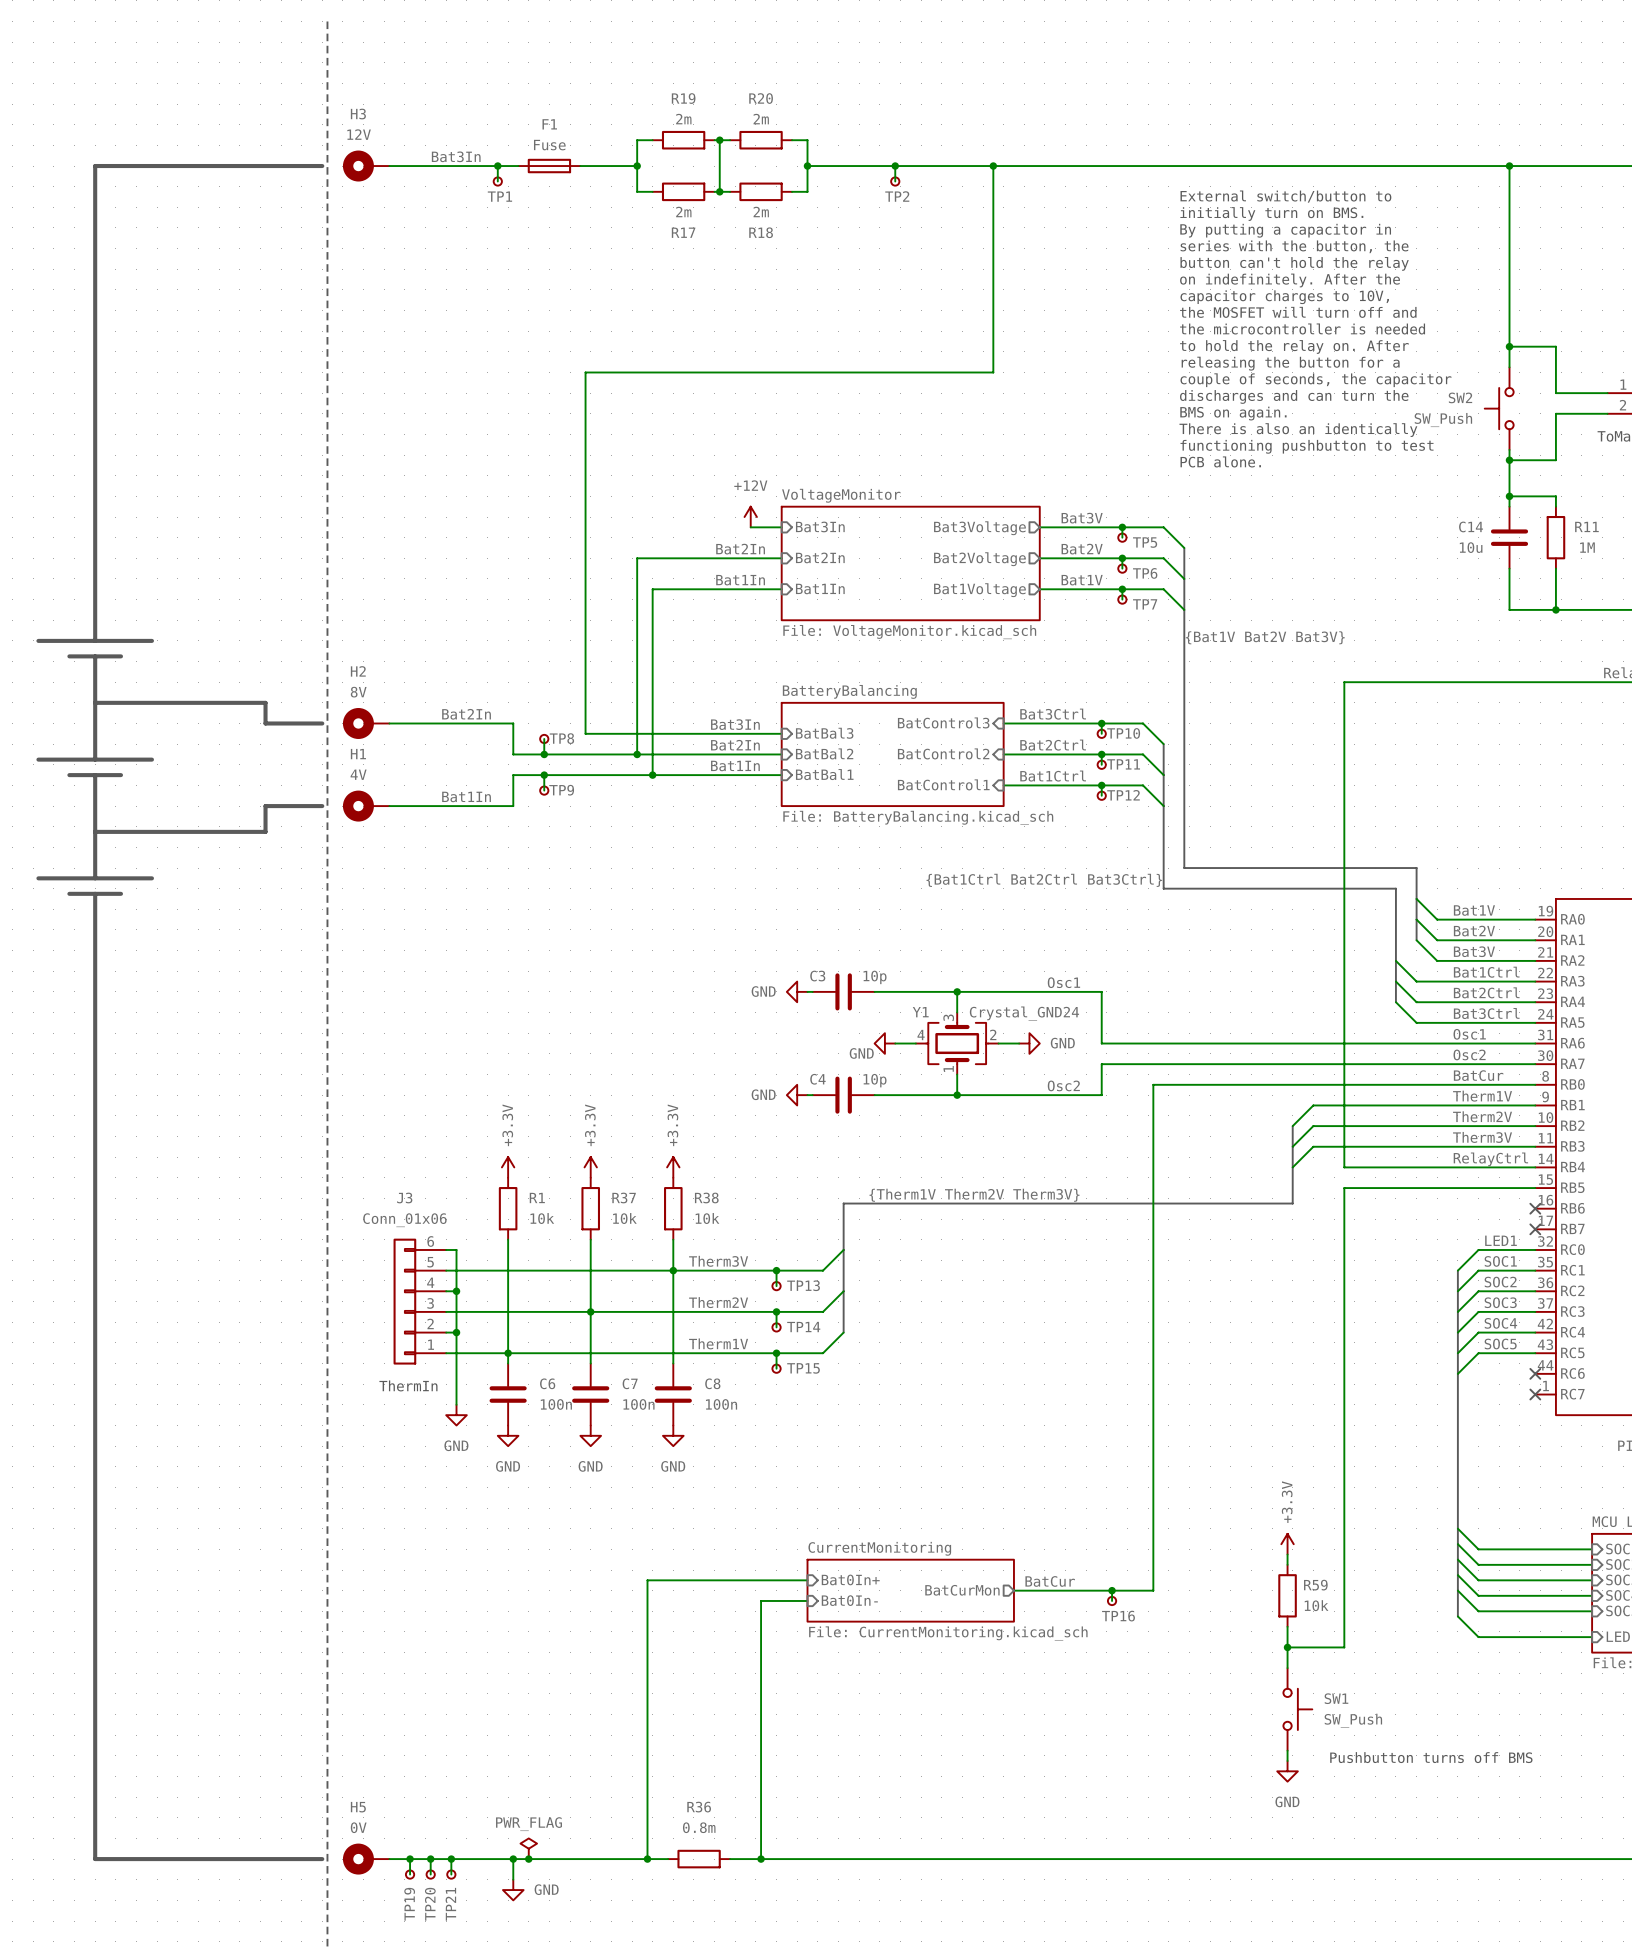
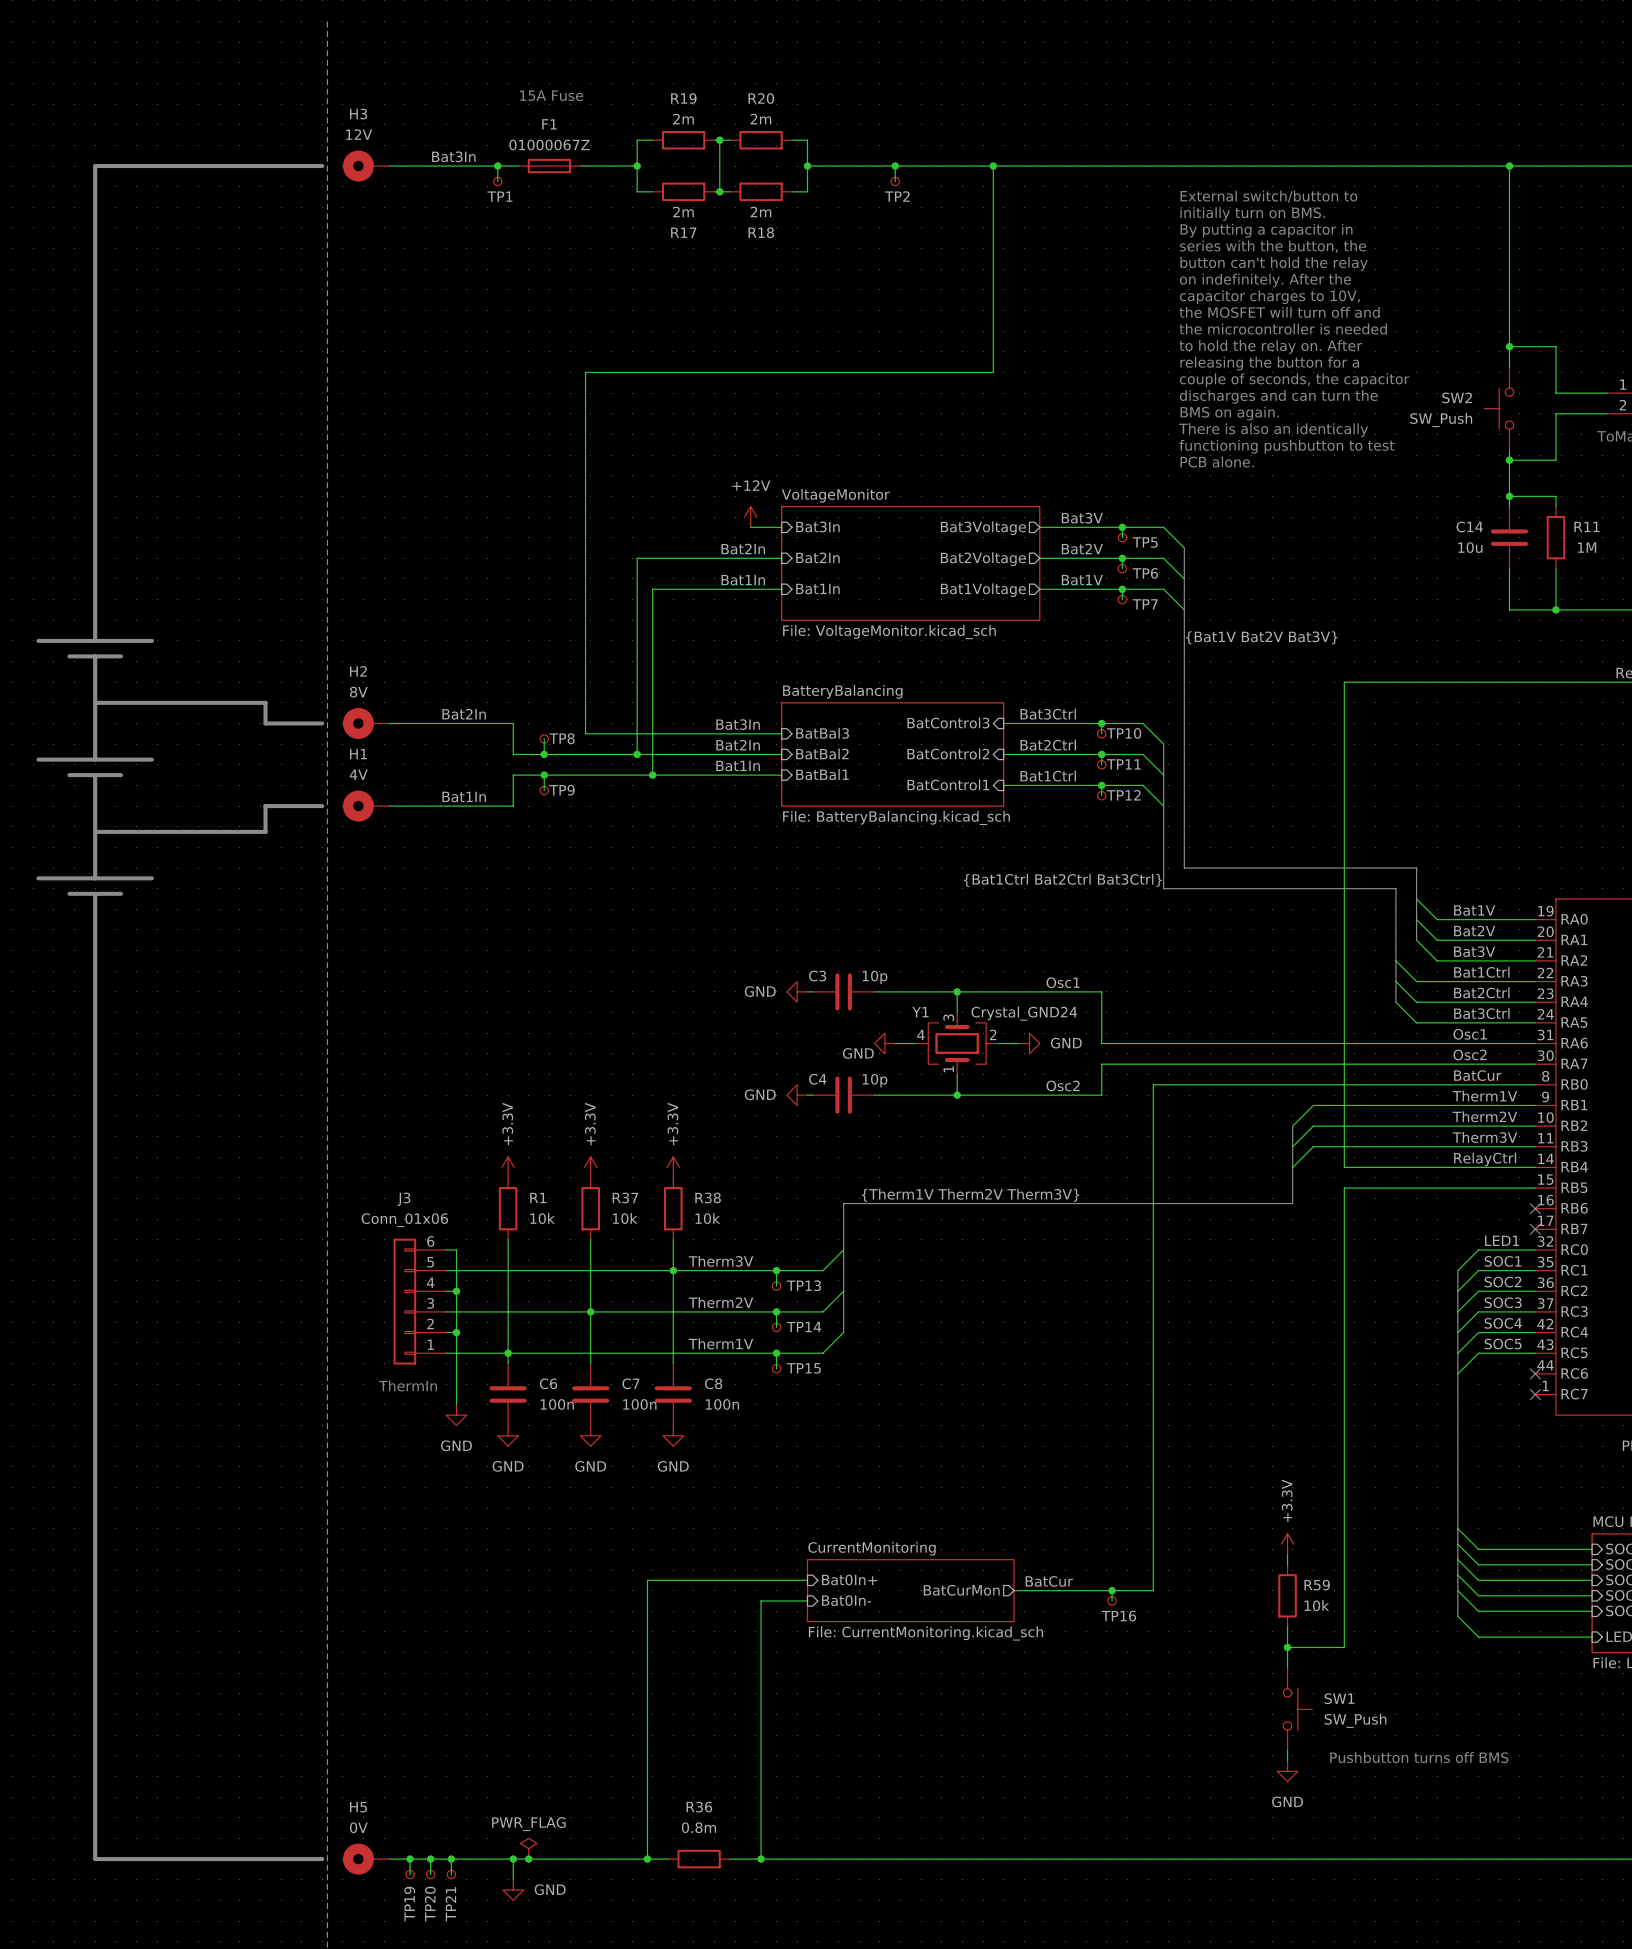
text: none -> 15A Fuse (551, 95)
F1 value: Fuse (549, 145) -> 01000067Z (549, 145)

